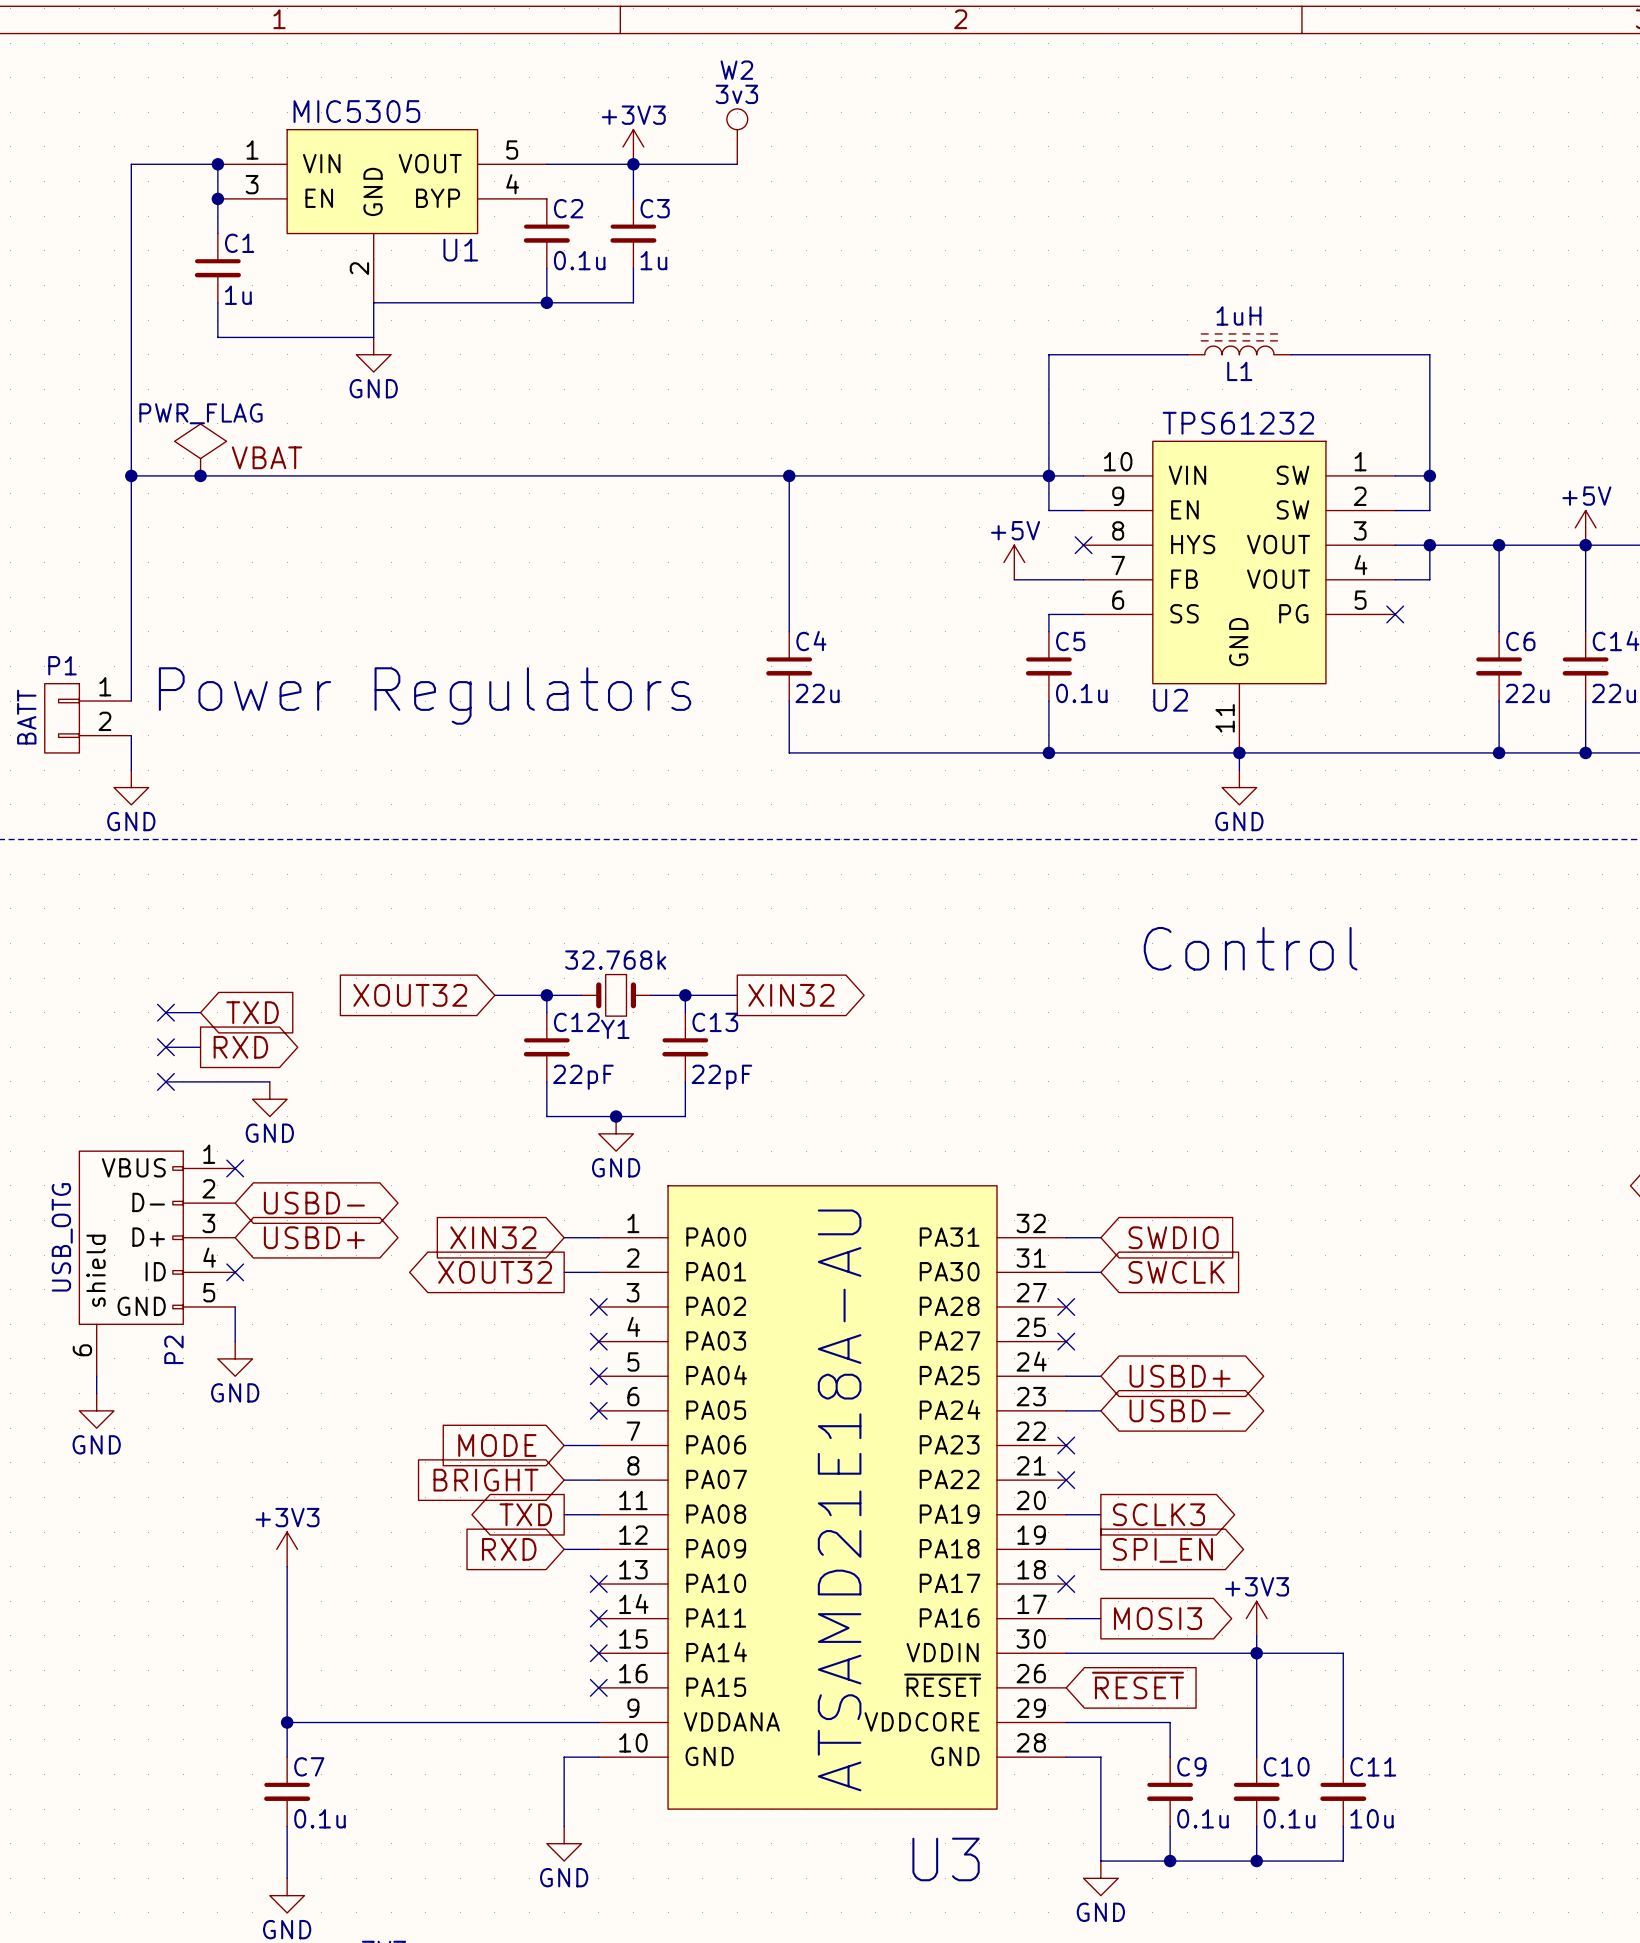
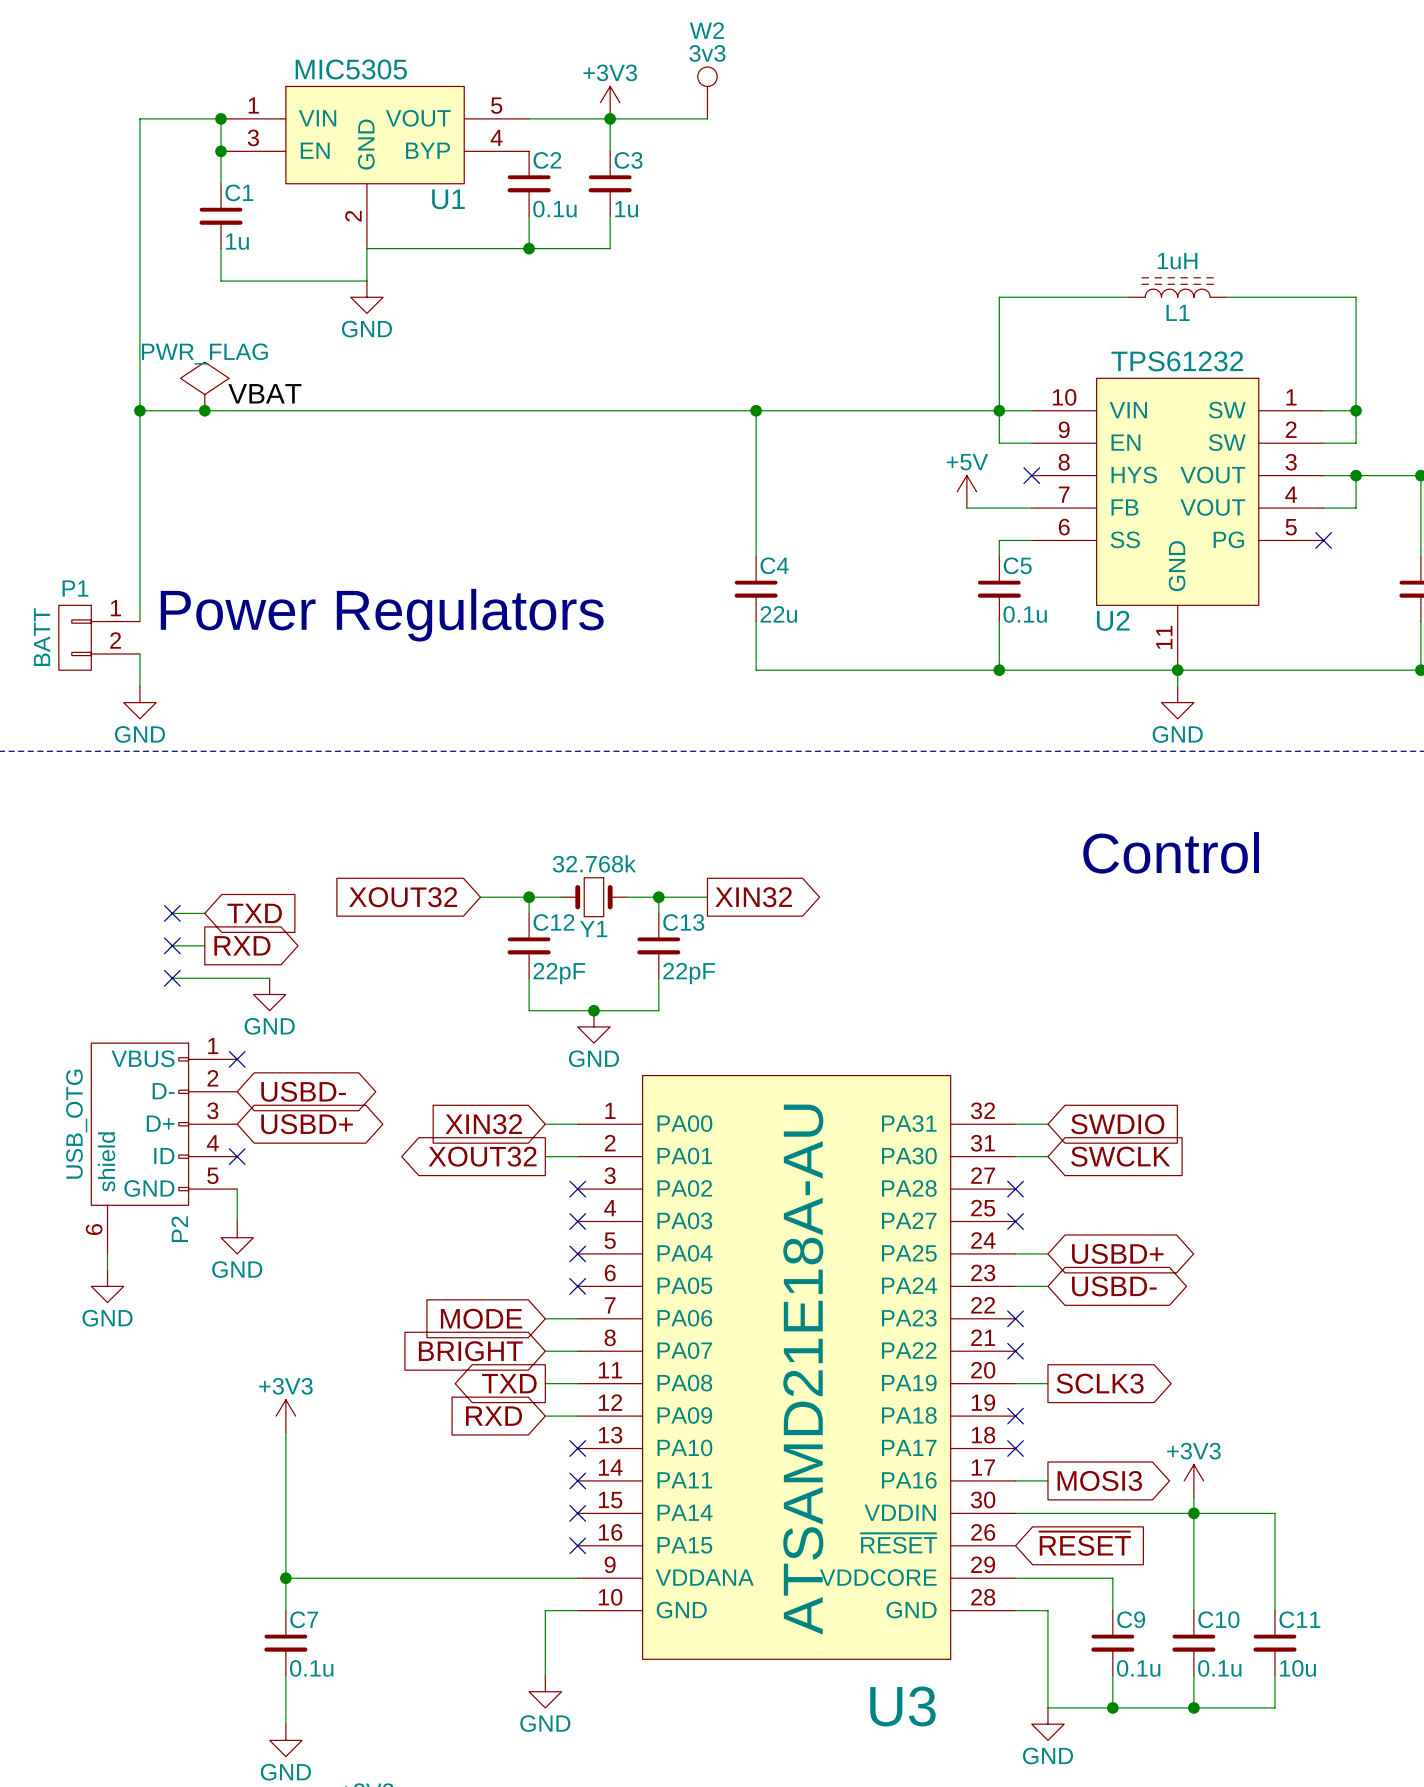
wire: (1066, 1549) (1100, 1549) -> none
no-connect mark: none -> (1015, 1416)
global label: SPI_EN (1162, 1550) -> none

